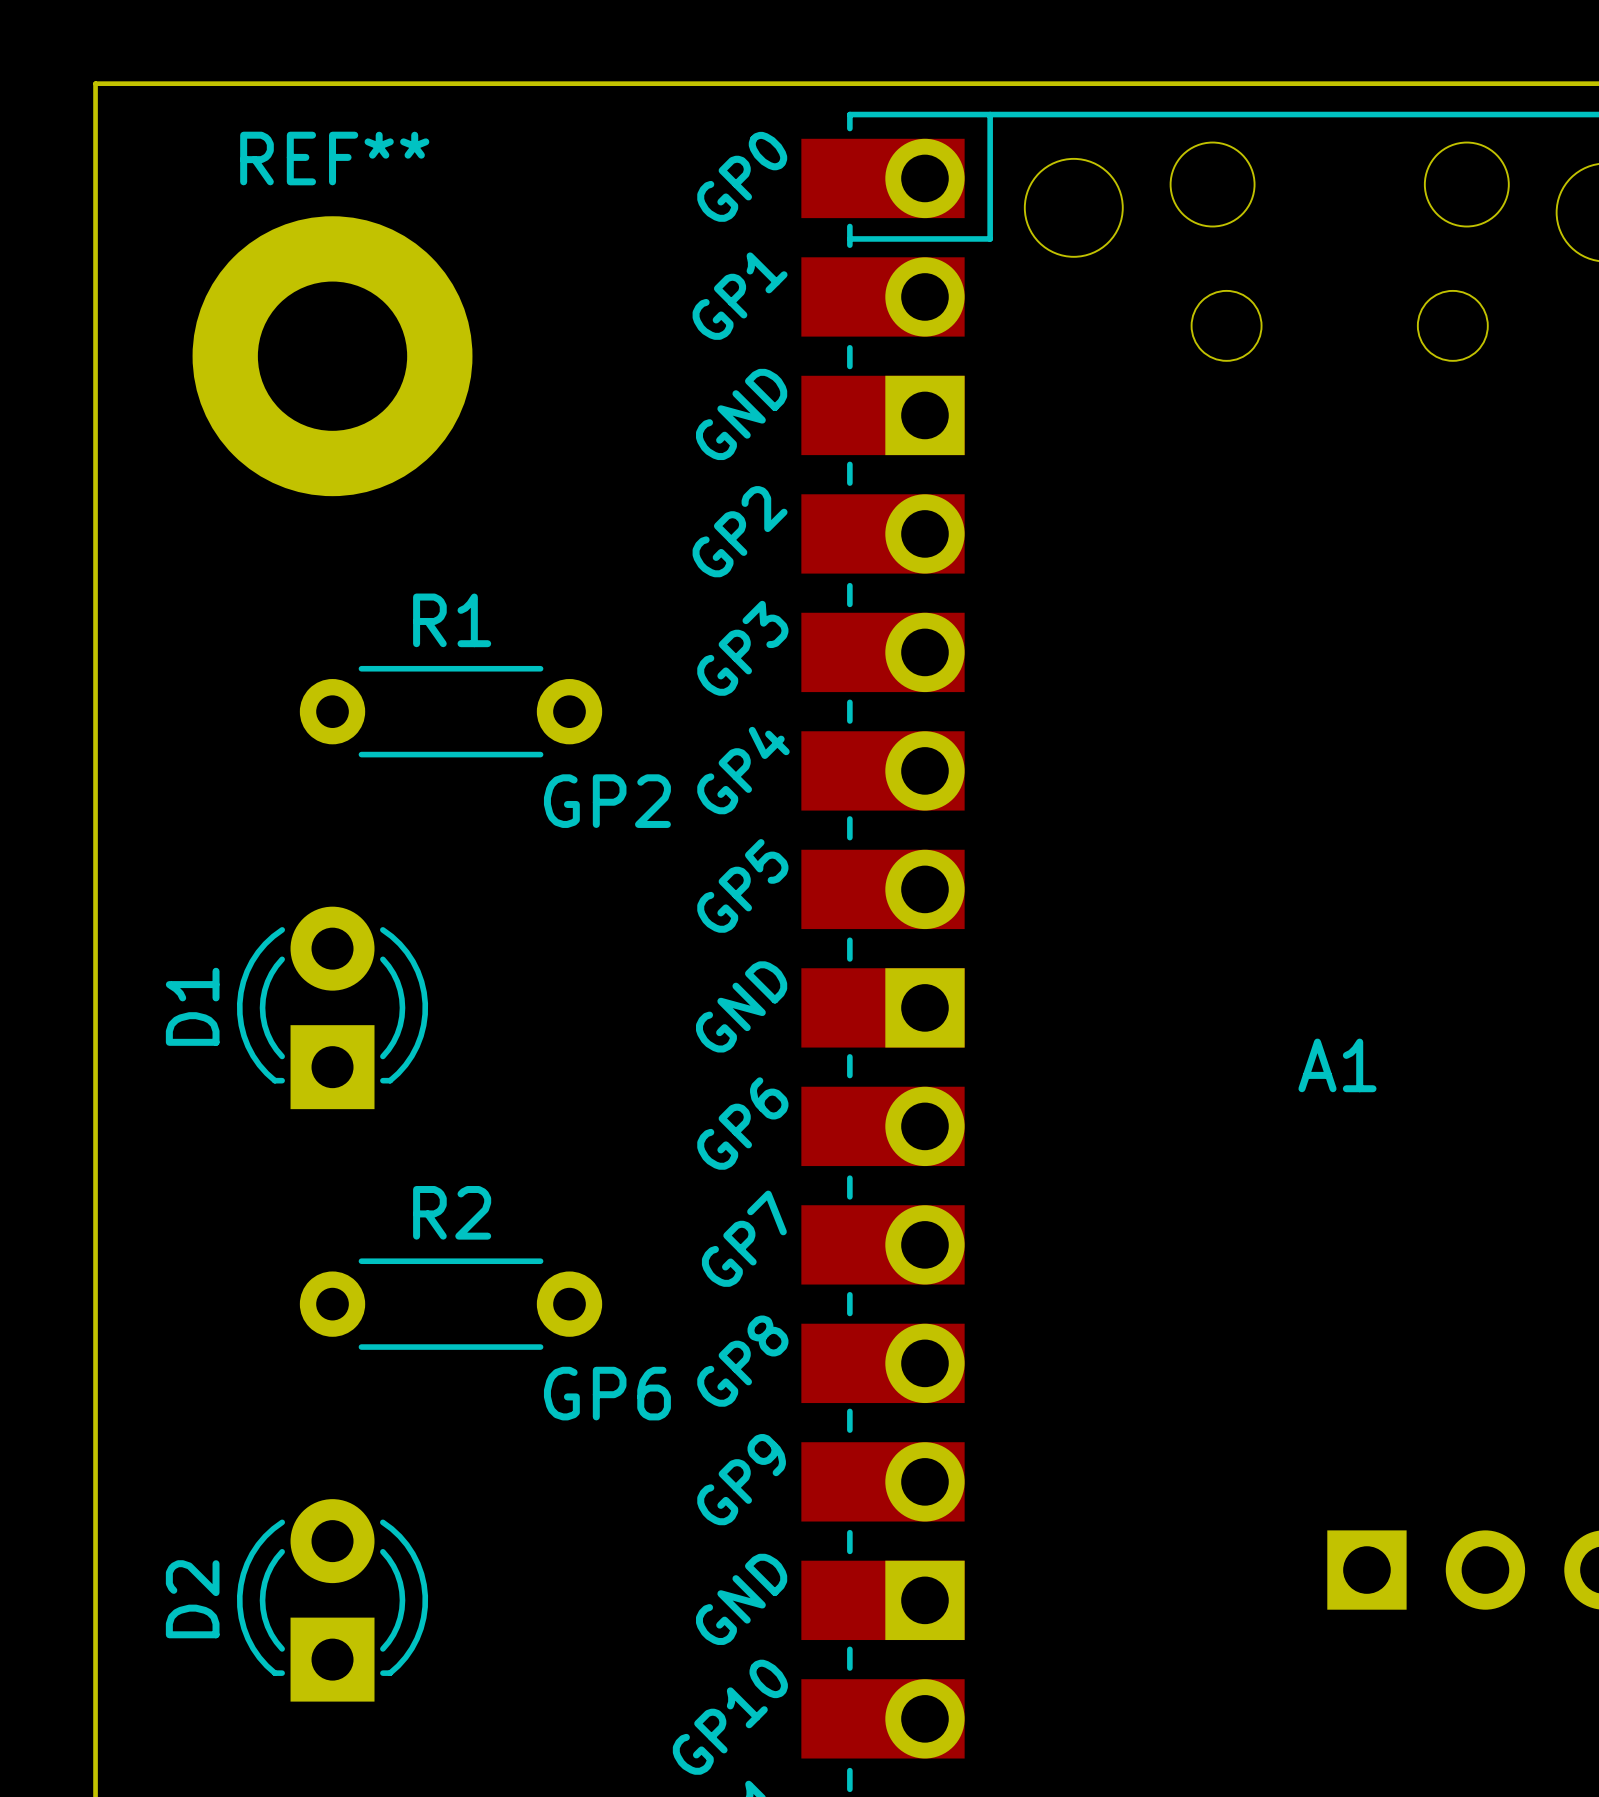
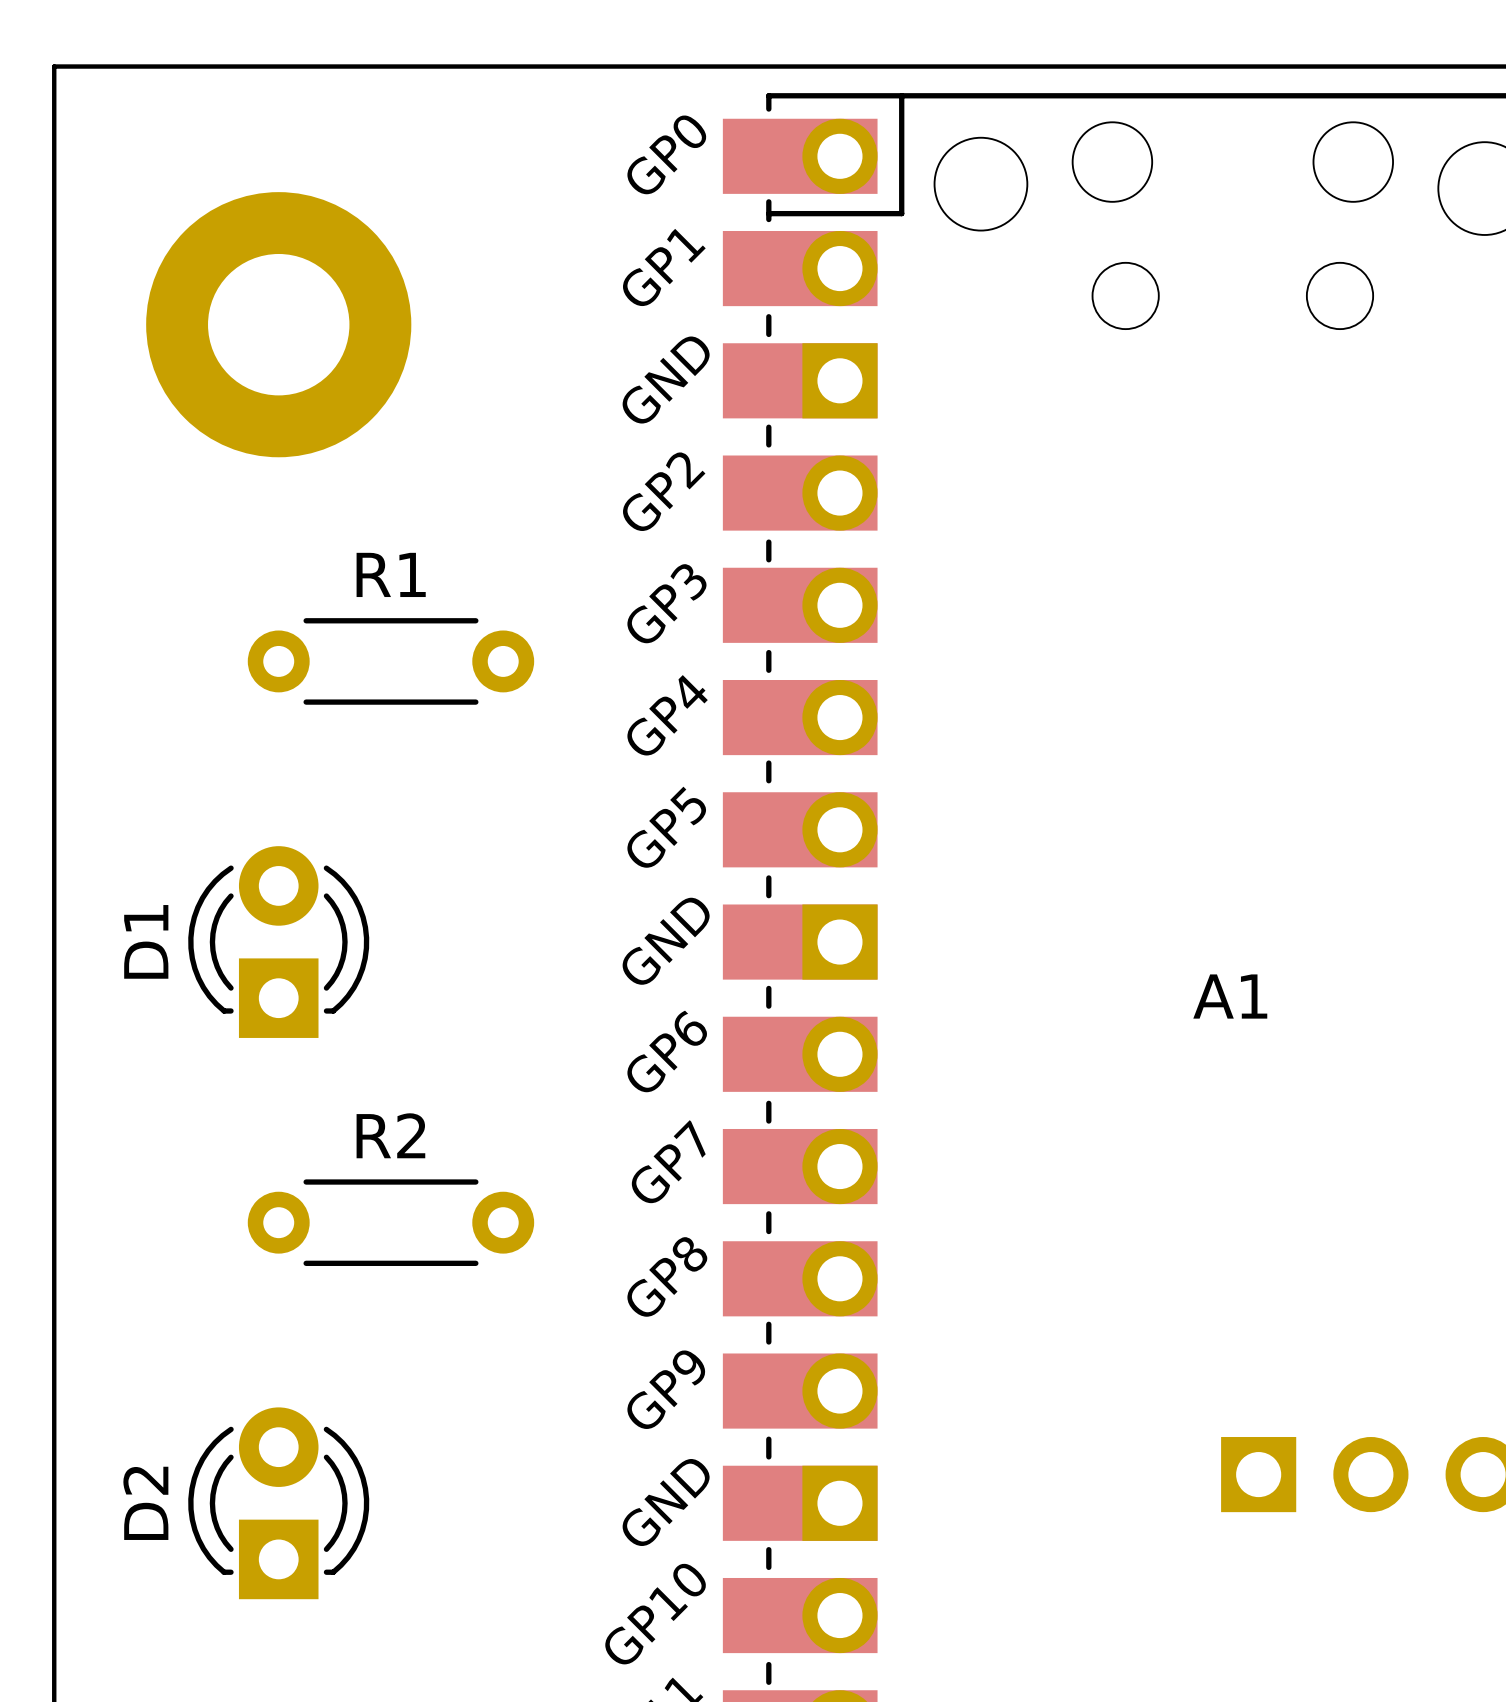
REF** name: REF** (334, 158) -> none
text: GP2 (607, 801) -> none
text: GP6 (607, 1393) -> none

